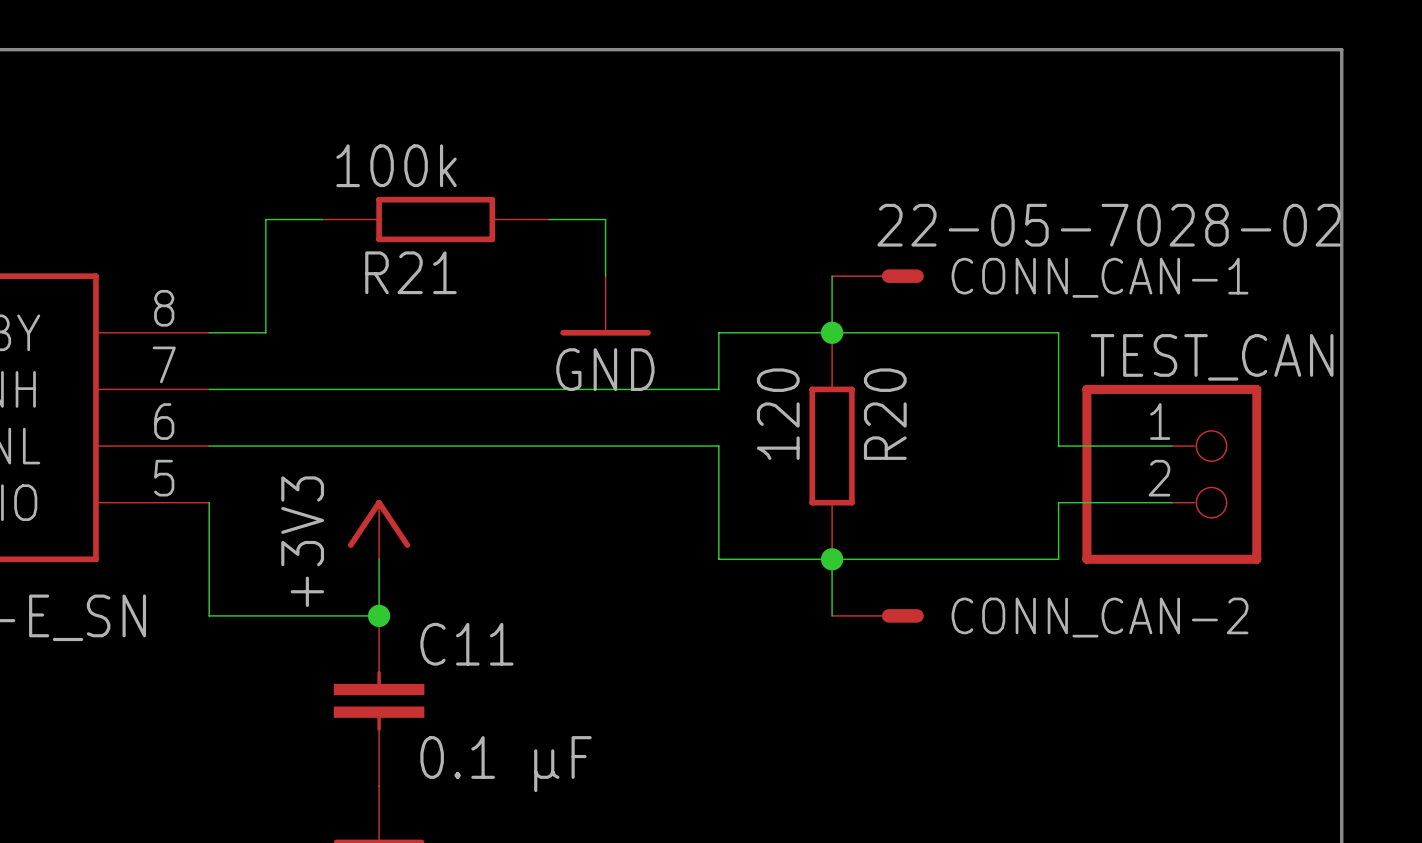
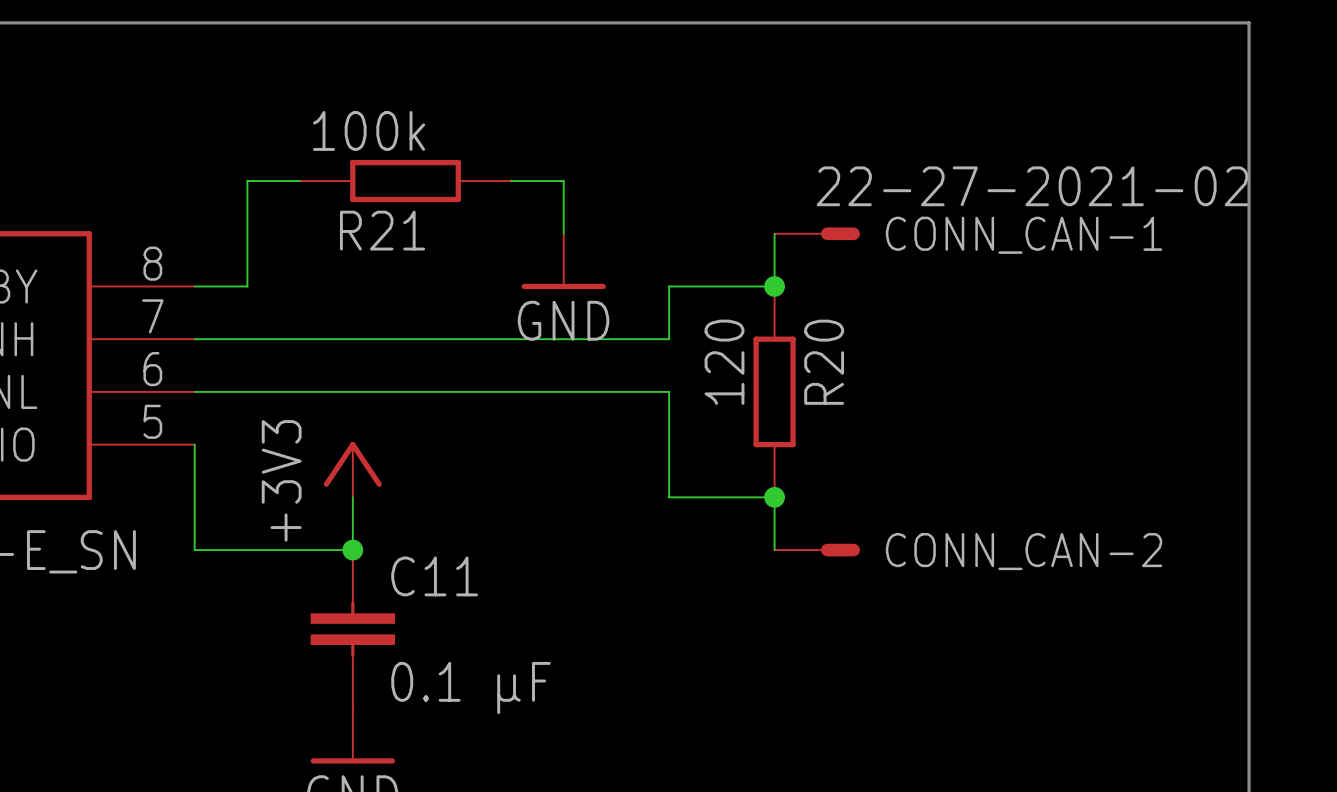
CONN_CAN-1 value: 22-05-7028-02 (1109, 225) -> 22-27-2021-02 (1032, 186)
wire: (832, 332) (1058, 332) (1058, 446) (1171, 446) -> none
TEST_CAN: (1171, 474) -> none
wire: (1171, 502) (1058, 502) (1058, 559) (832, 559) -> none

